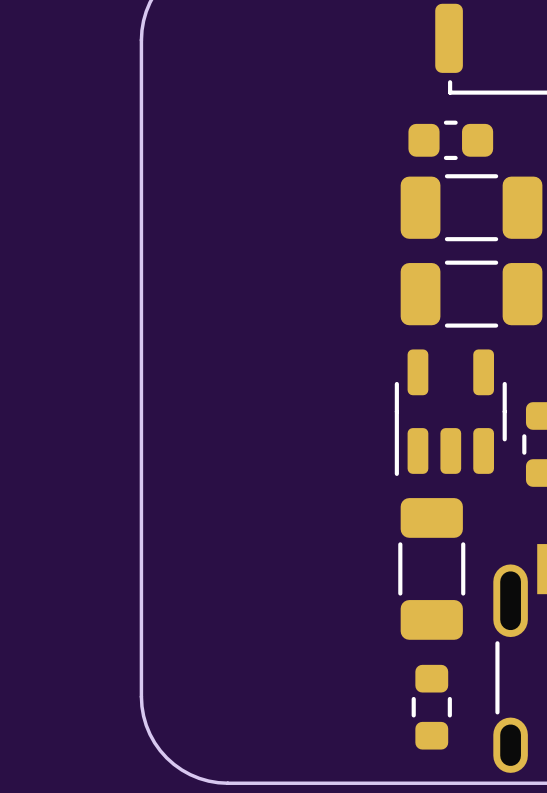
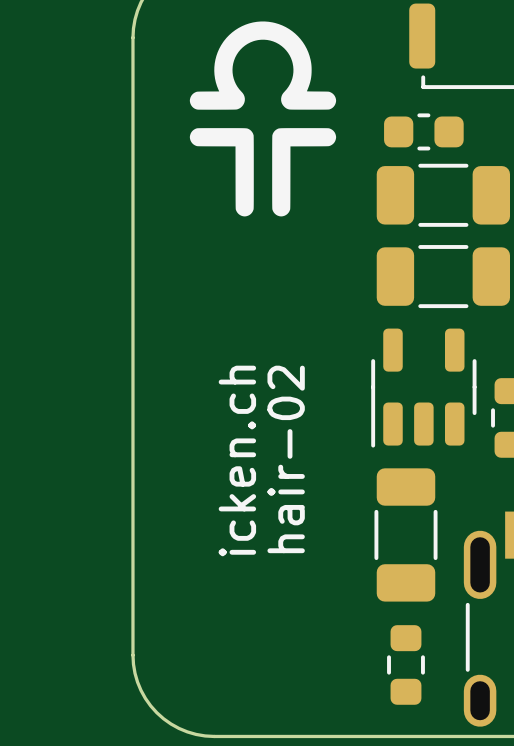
drawing: none -> [189, 21, 337, 217]
text: none -> hair-02 (286, 459)
text: none -> icken.ch (237, 460)

